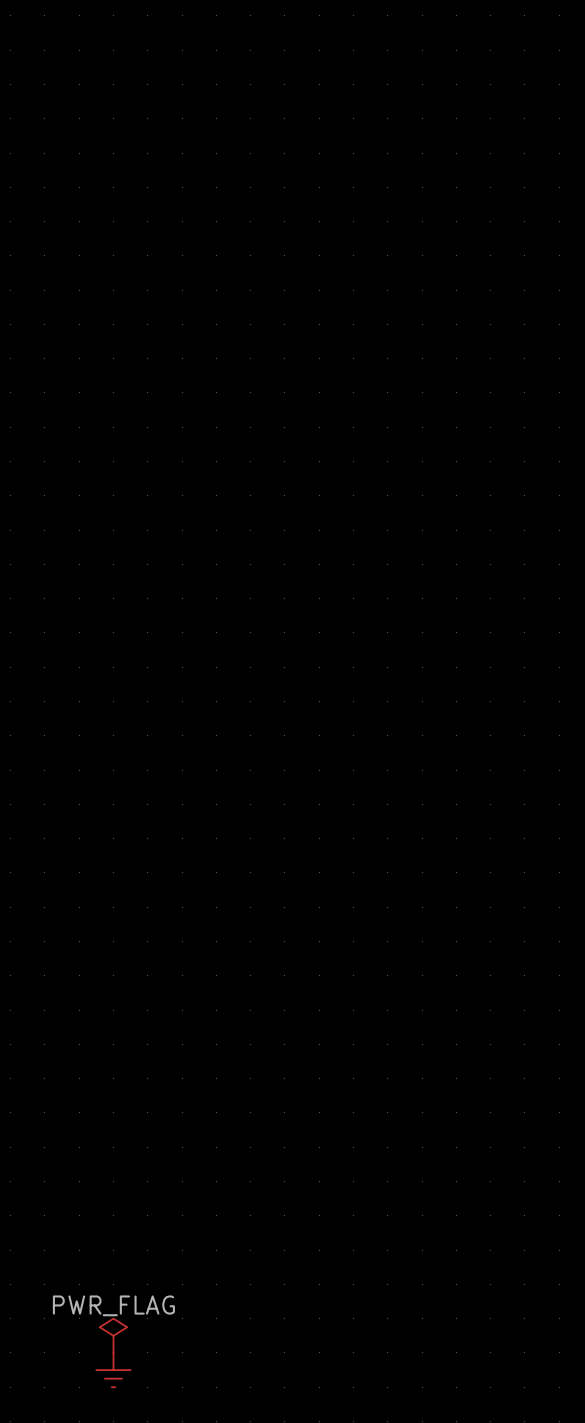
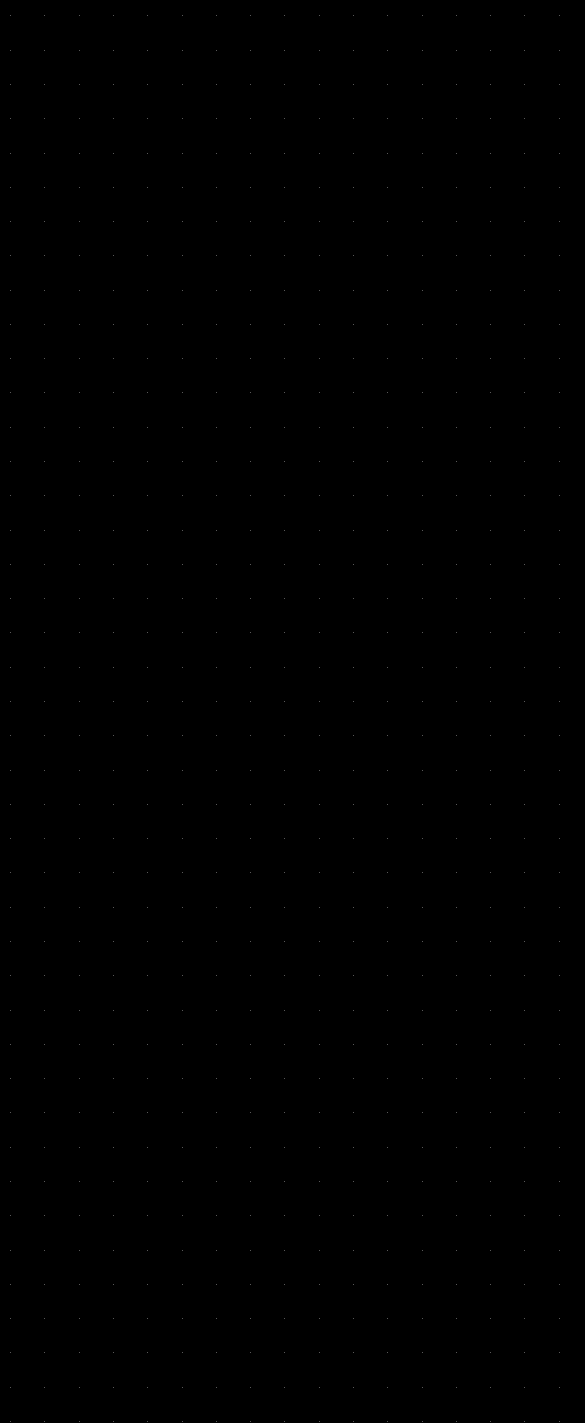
power symbol: PWR_FLAG (113, 1335) -> none
power symbol: (113, 1370) -> none

